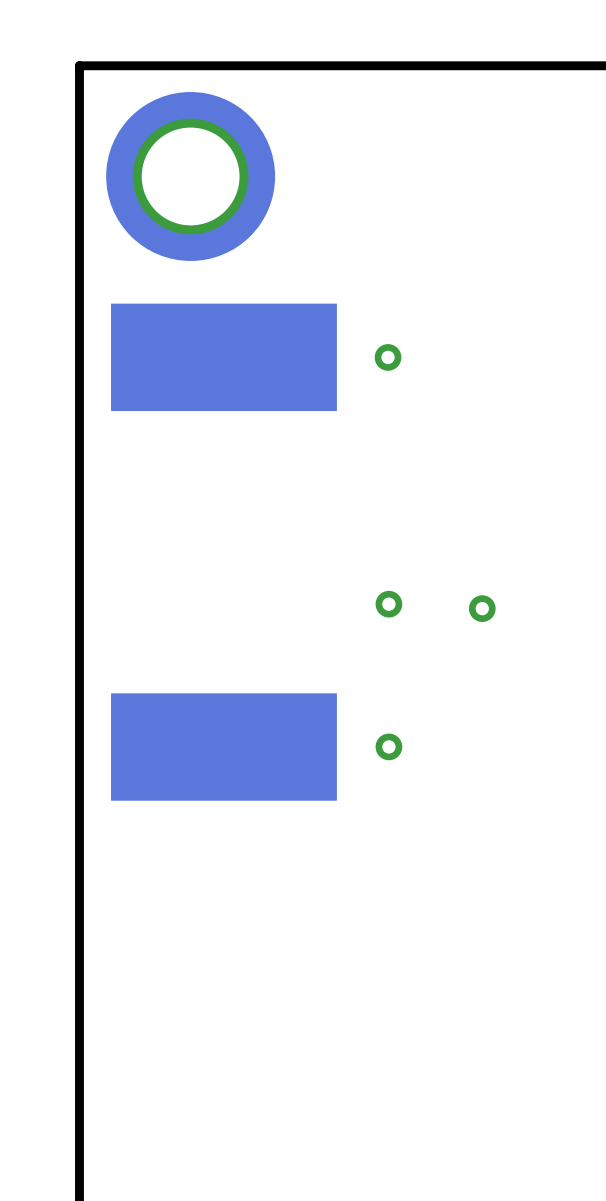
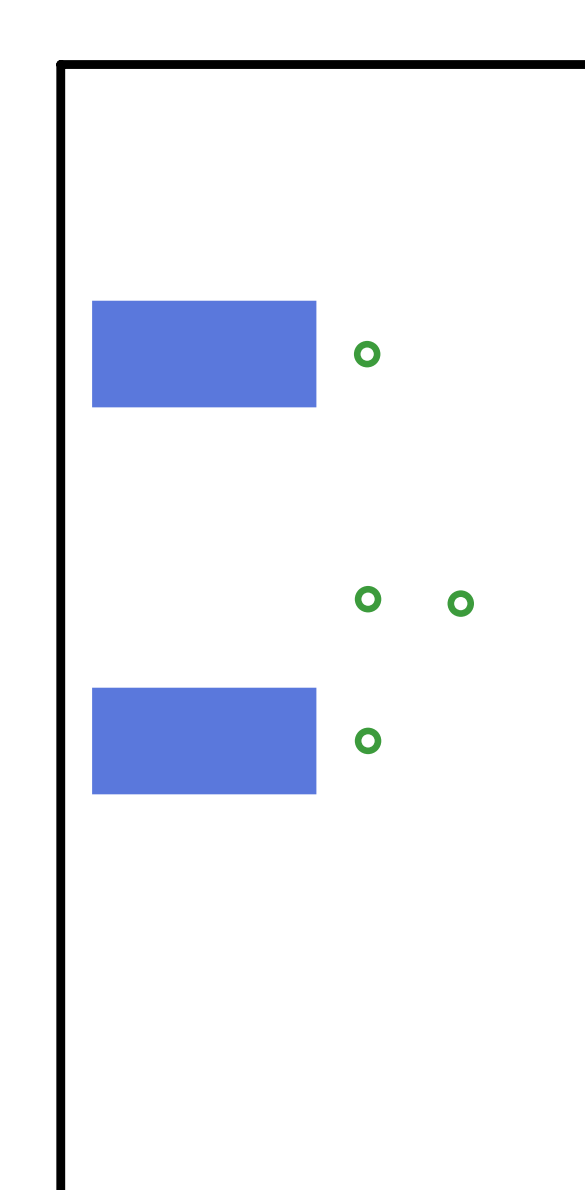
part: (190, 176) -> none

